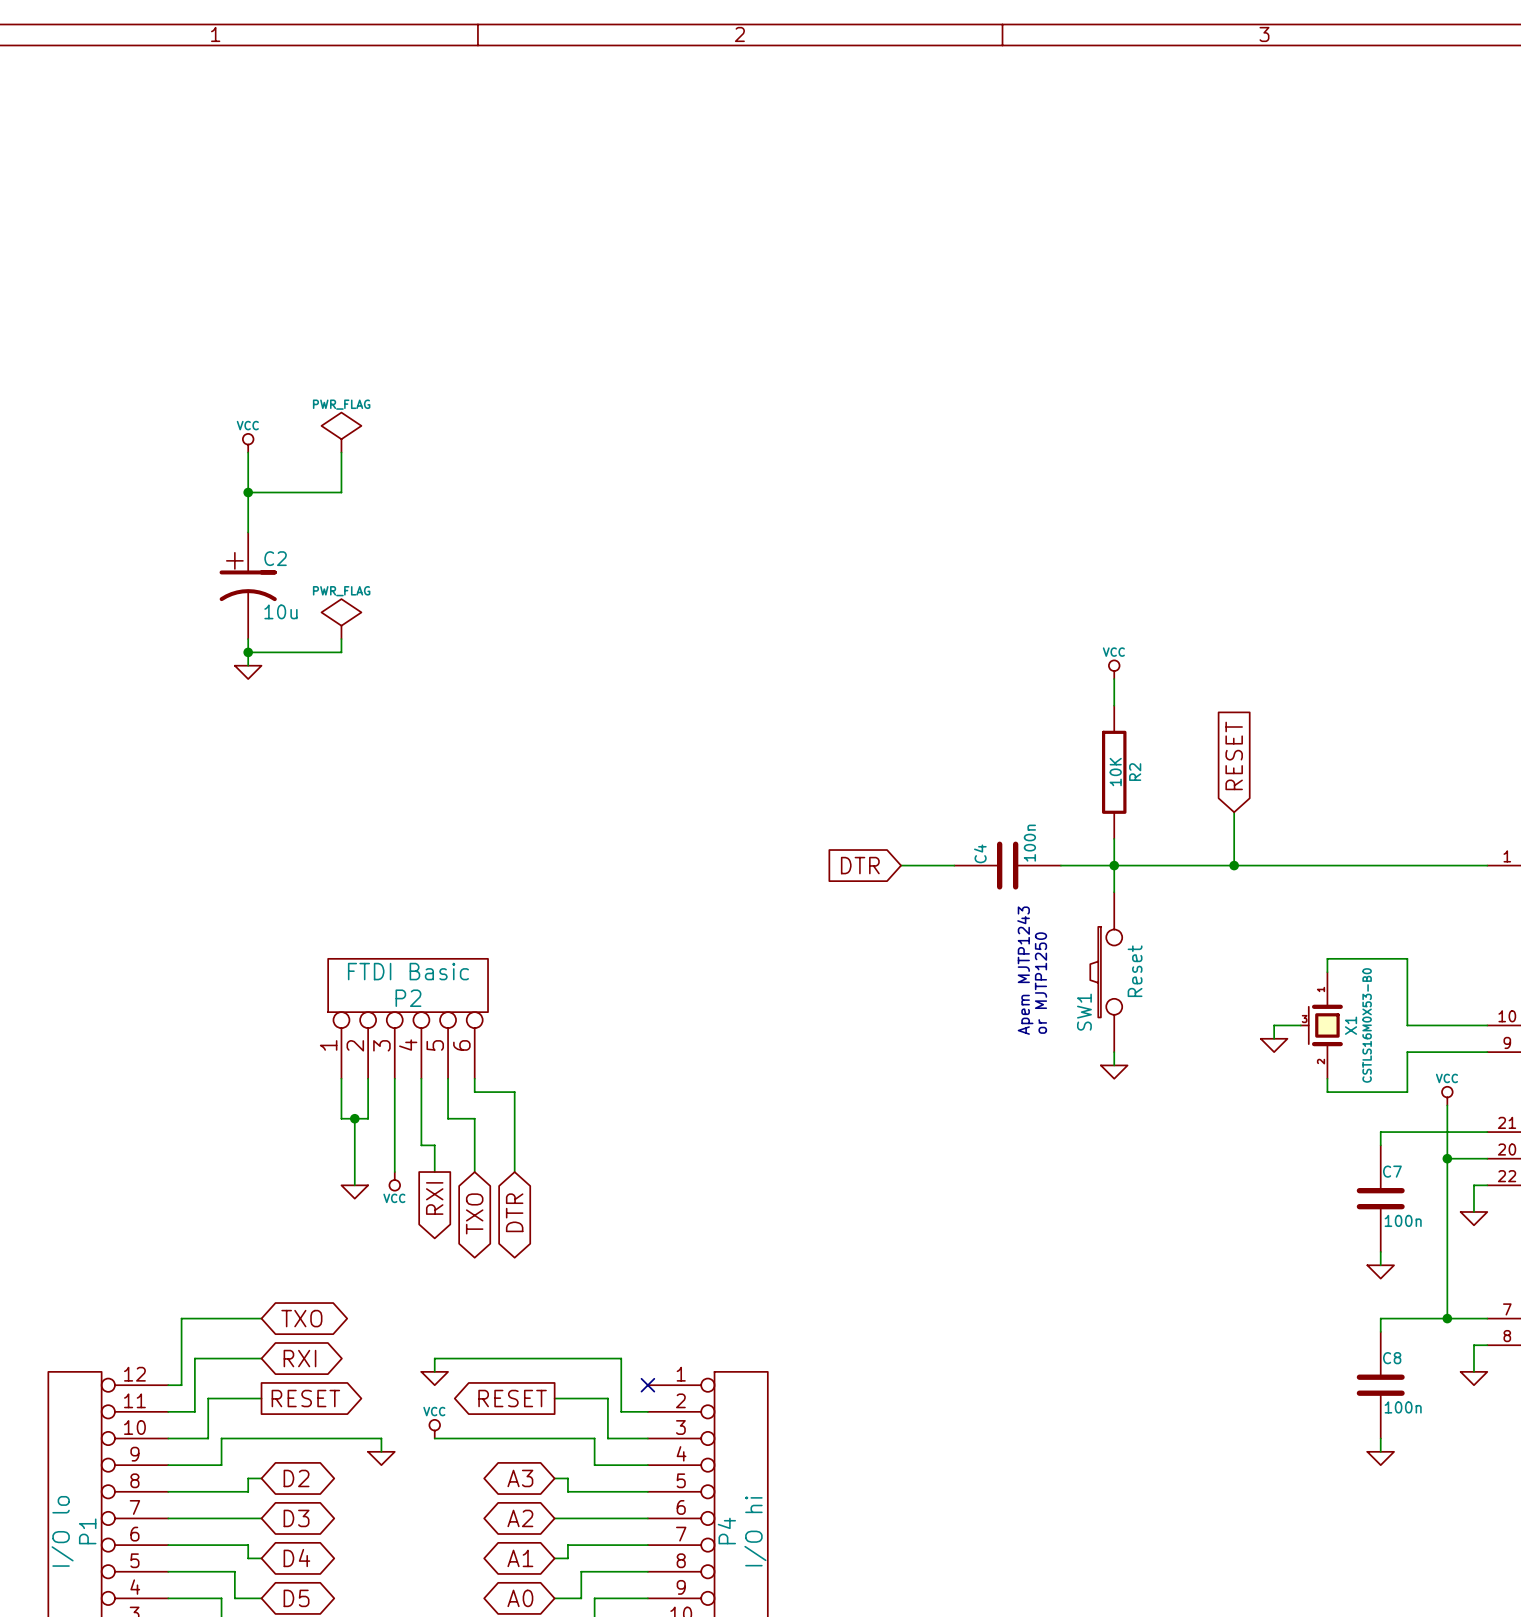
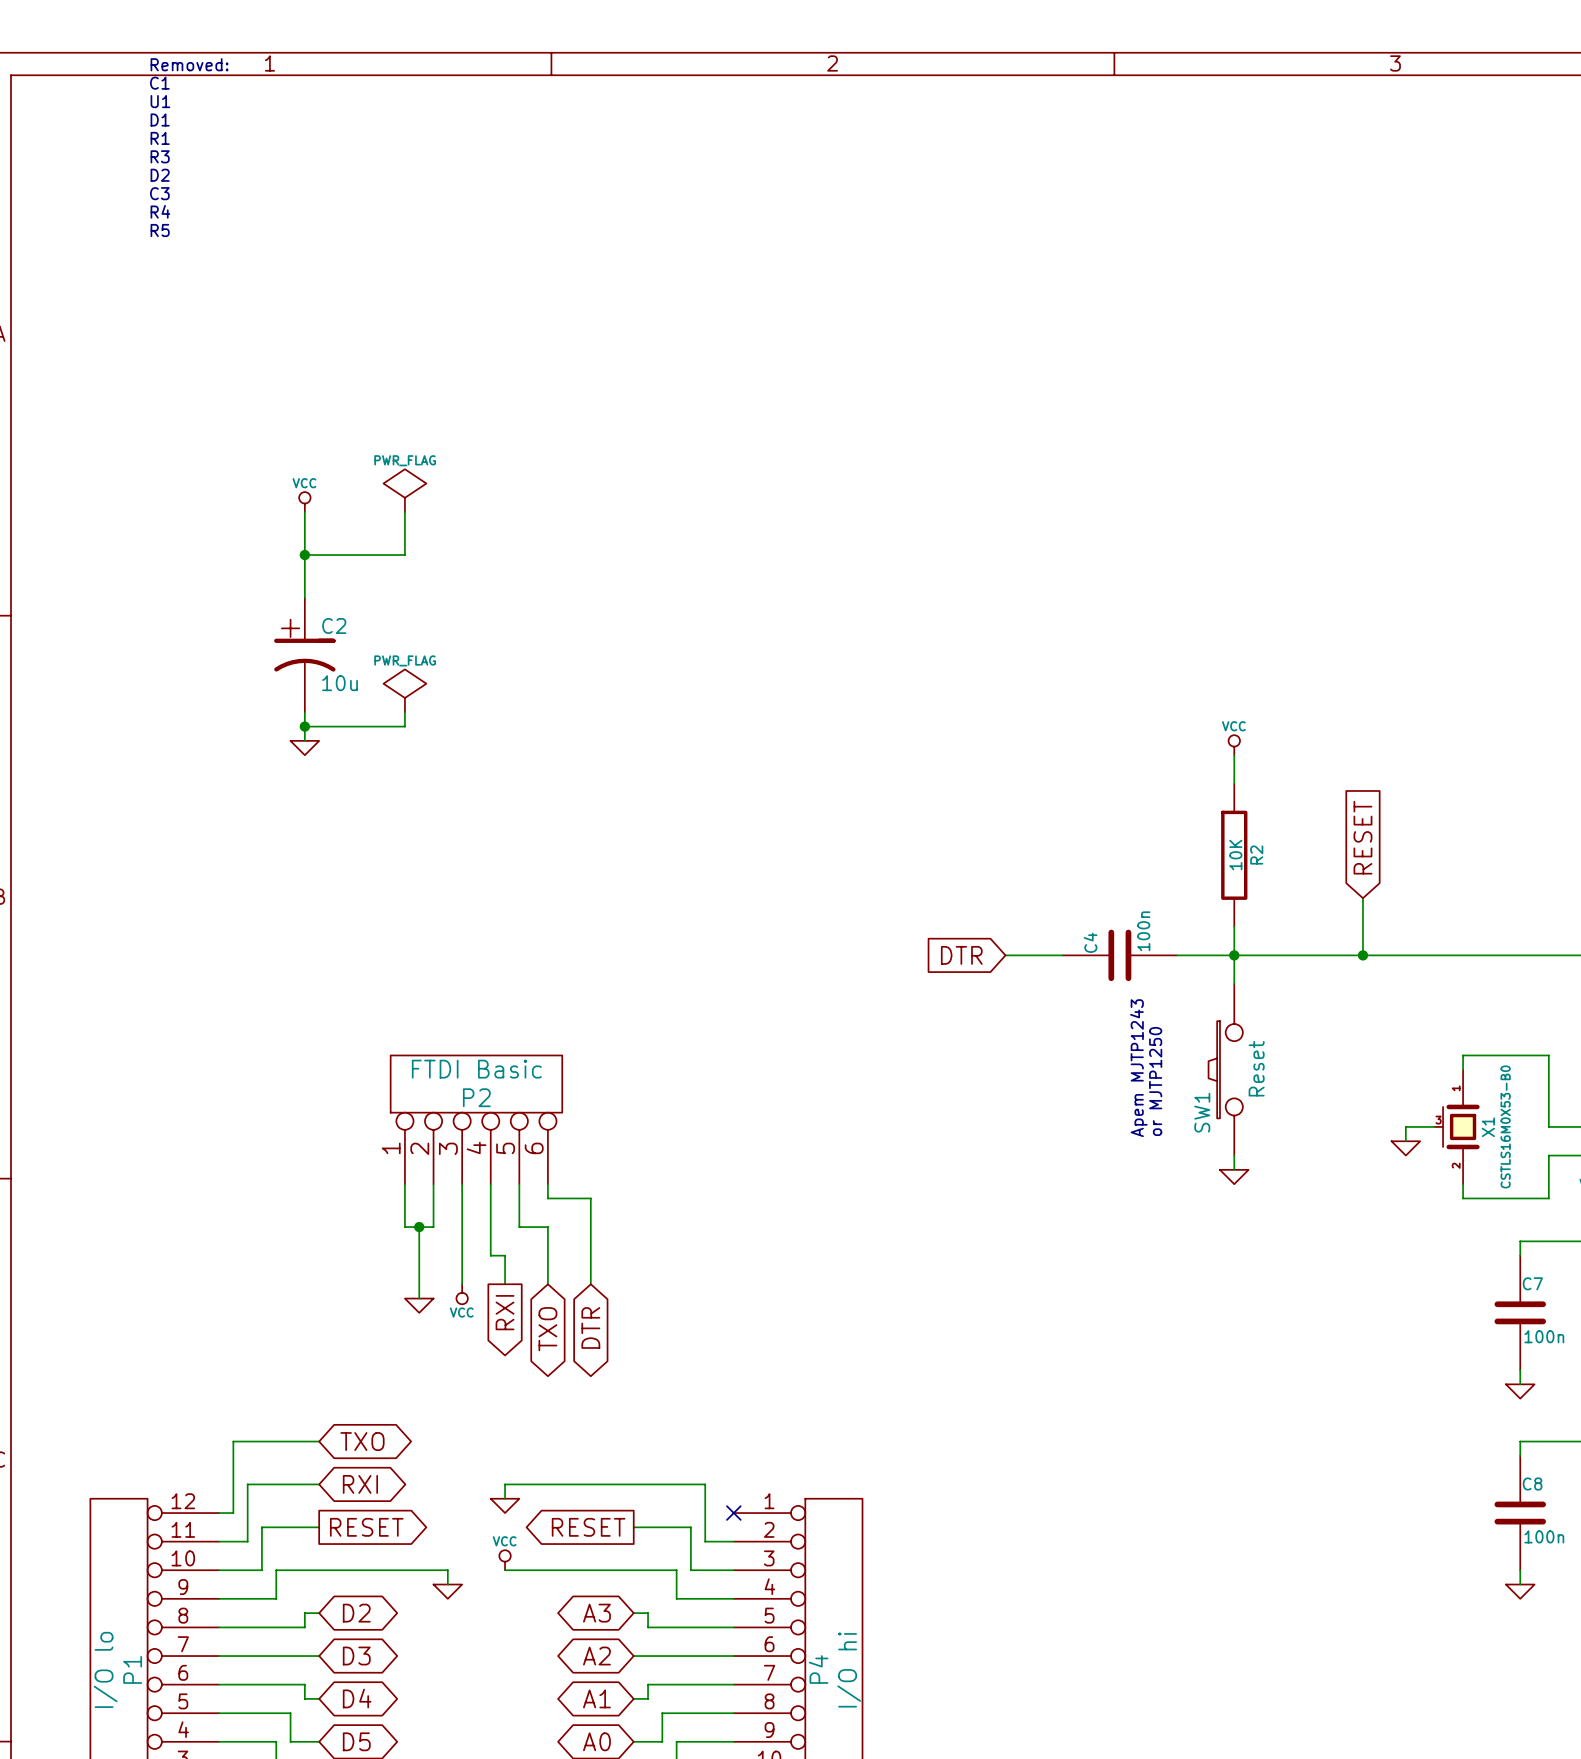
text: none -> Removed: (189, 64)
text: none -> C1 (159, 83)
text: none -> U1 (160, 101)
text: none -> D1 (160, 120)
text: none -> R1 (160, 138)
text: none -> R3 (160, 156)
text: none -> D2 (160, 175)
text: none -> C3 (159, 193)
text: none -> R4 (160, 211)
text: none -> R5 (160, 230)

